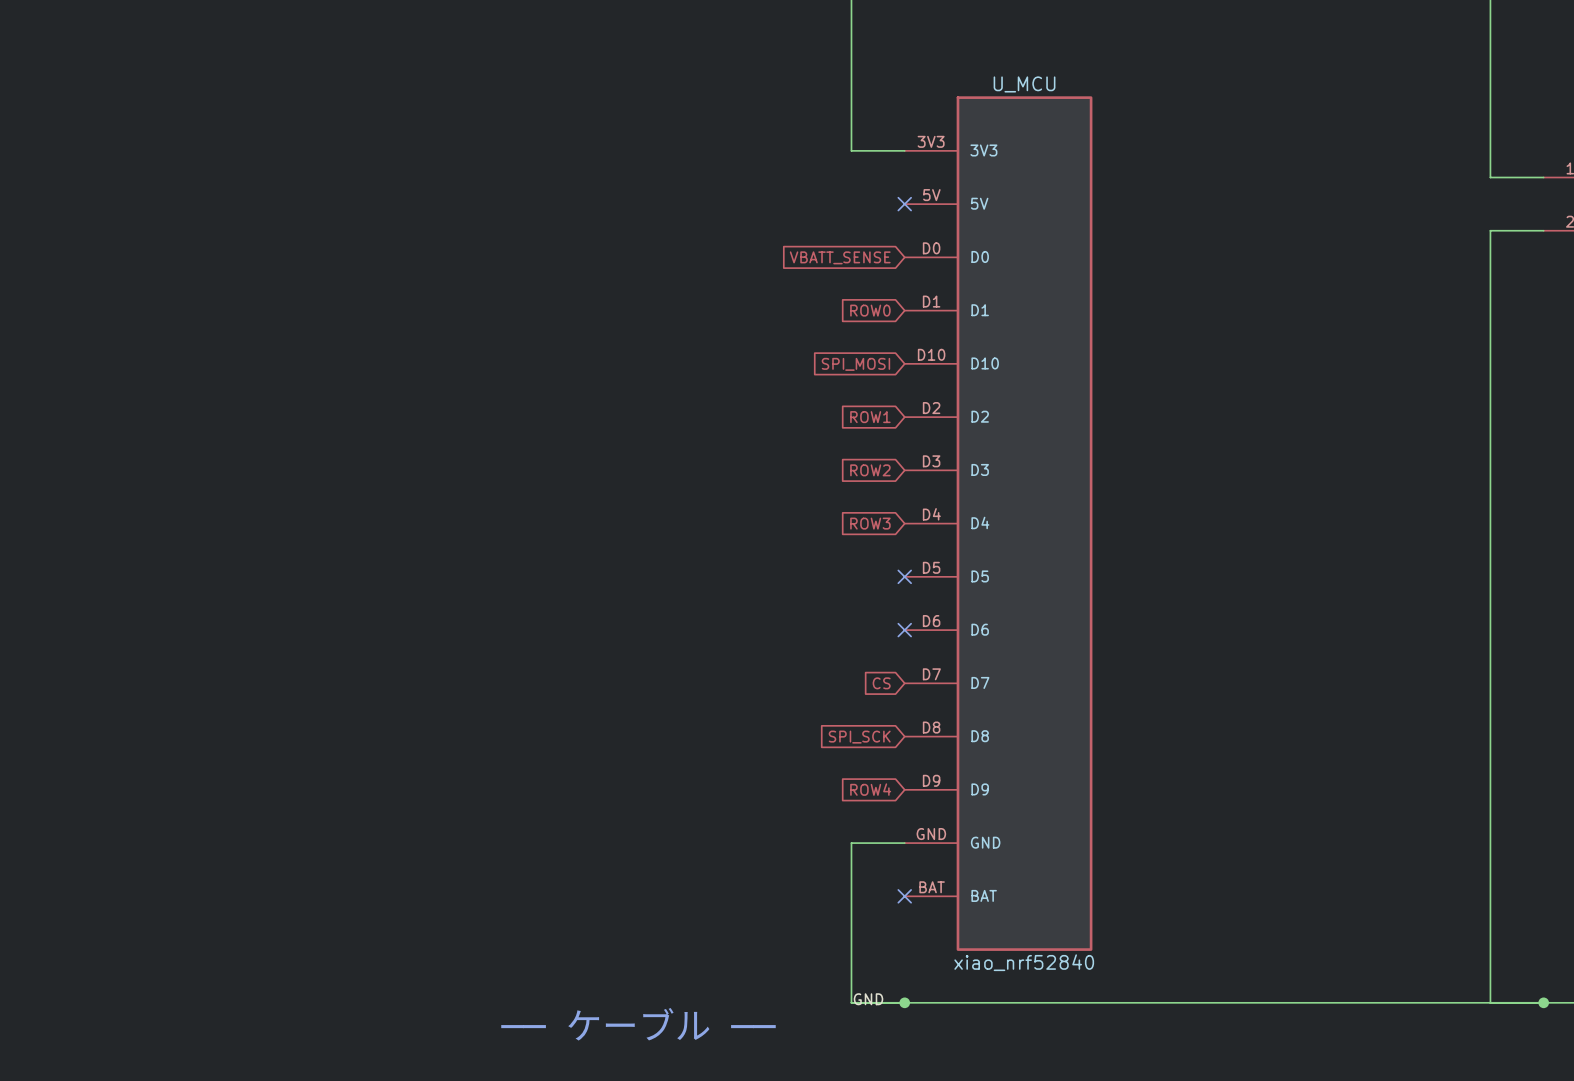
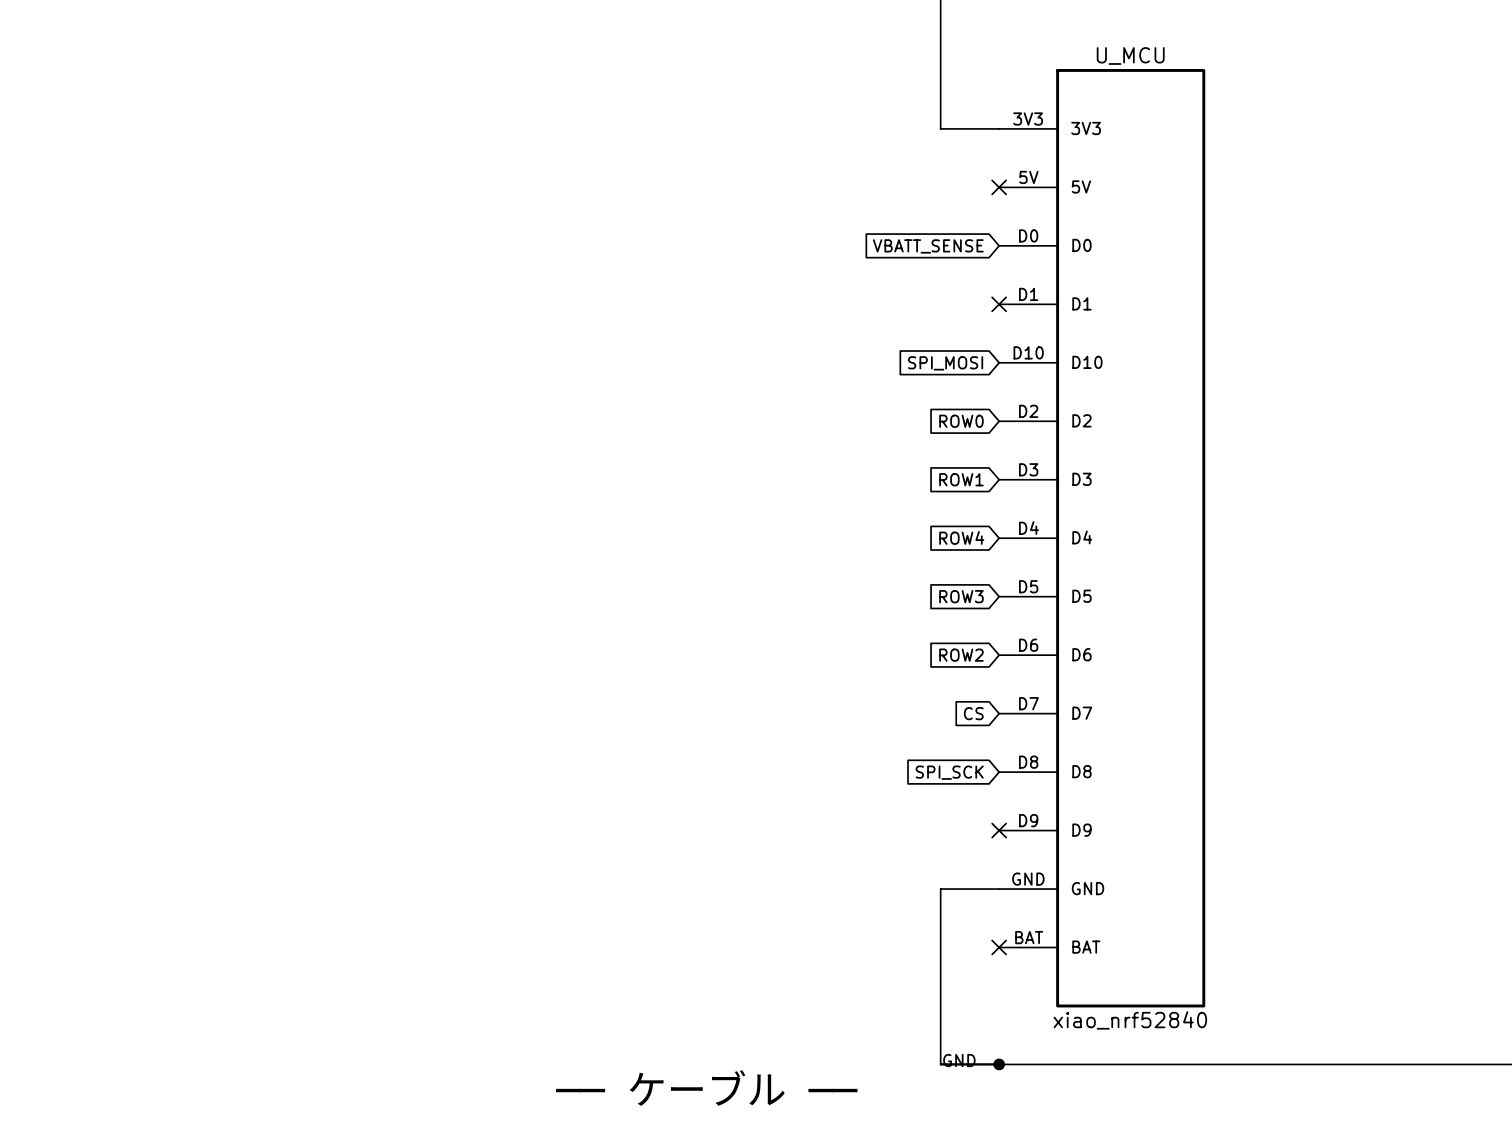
global label: ROW0 (870, 310) -> none
no-connect mark: none -> (999, 304)
global label: ROW1 (870, 417) -> ROW0 (961, 421)
global label: ROW2 (870, 470) -> ROW1 (961, 479)
global label: ROW3 (870, 523) -> ROW4 (961, 537)
global label: none -> ROW3 (961, 596)
no-connect mark: (904, 576) -> none
global label: none -> ROW2 (961, 655)
no-connect mark: (904, 630) -> none
global label: ROW4 (870, 789) -> none
no-connect mark: none -> (999, 830)

